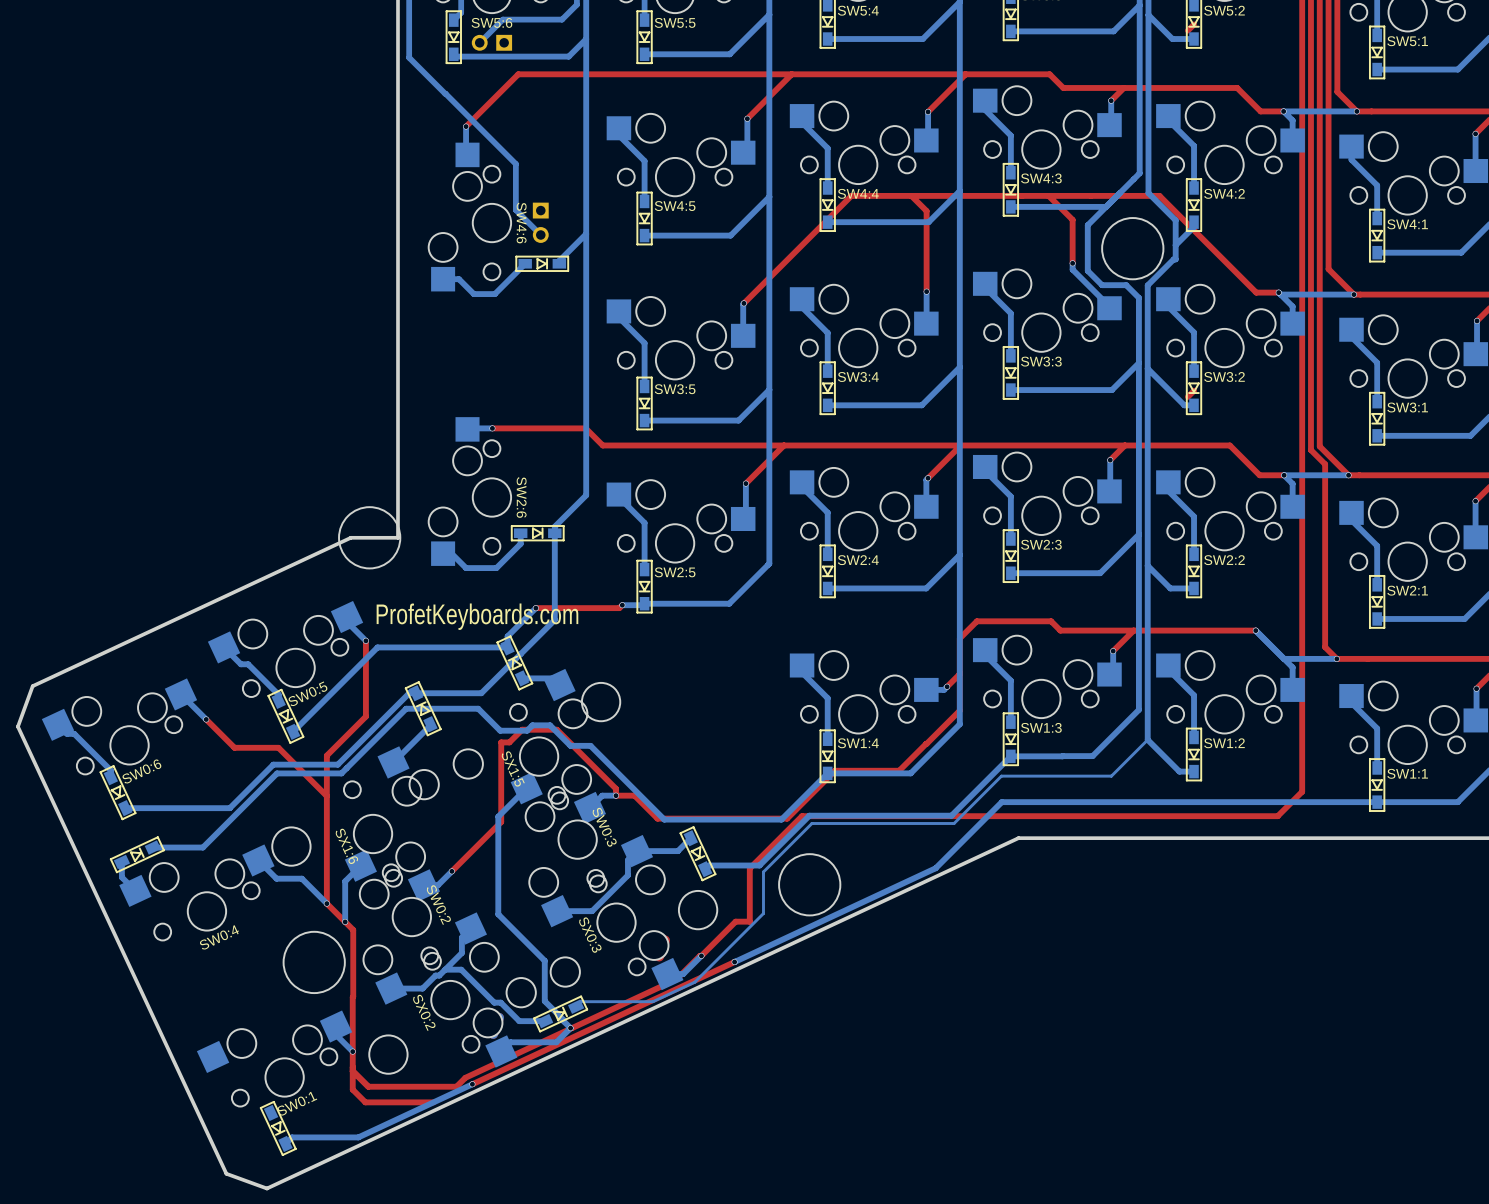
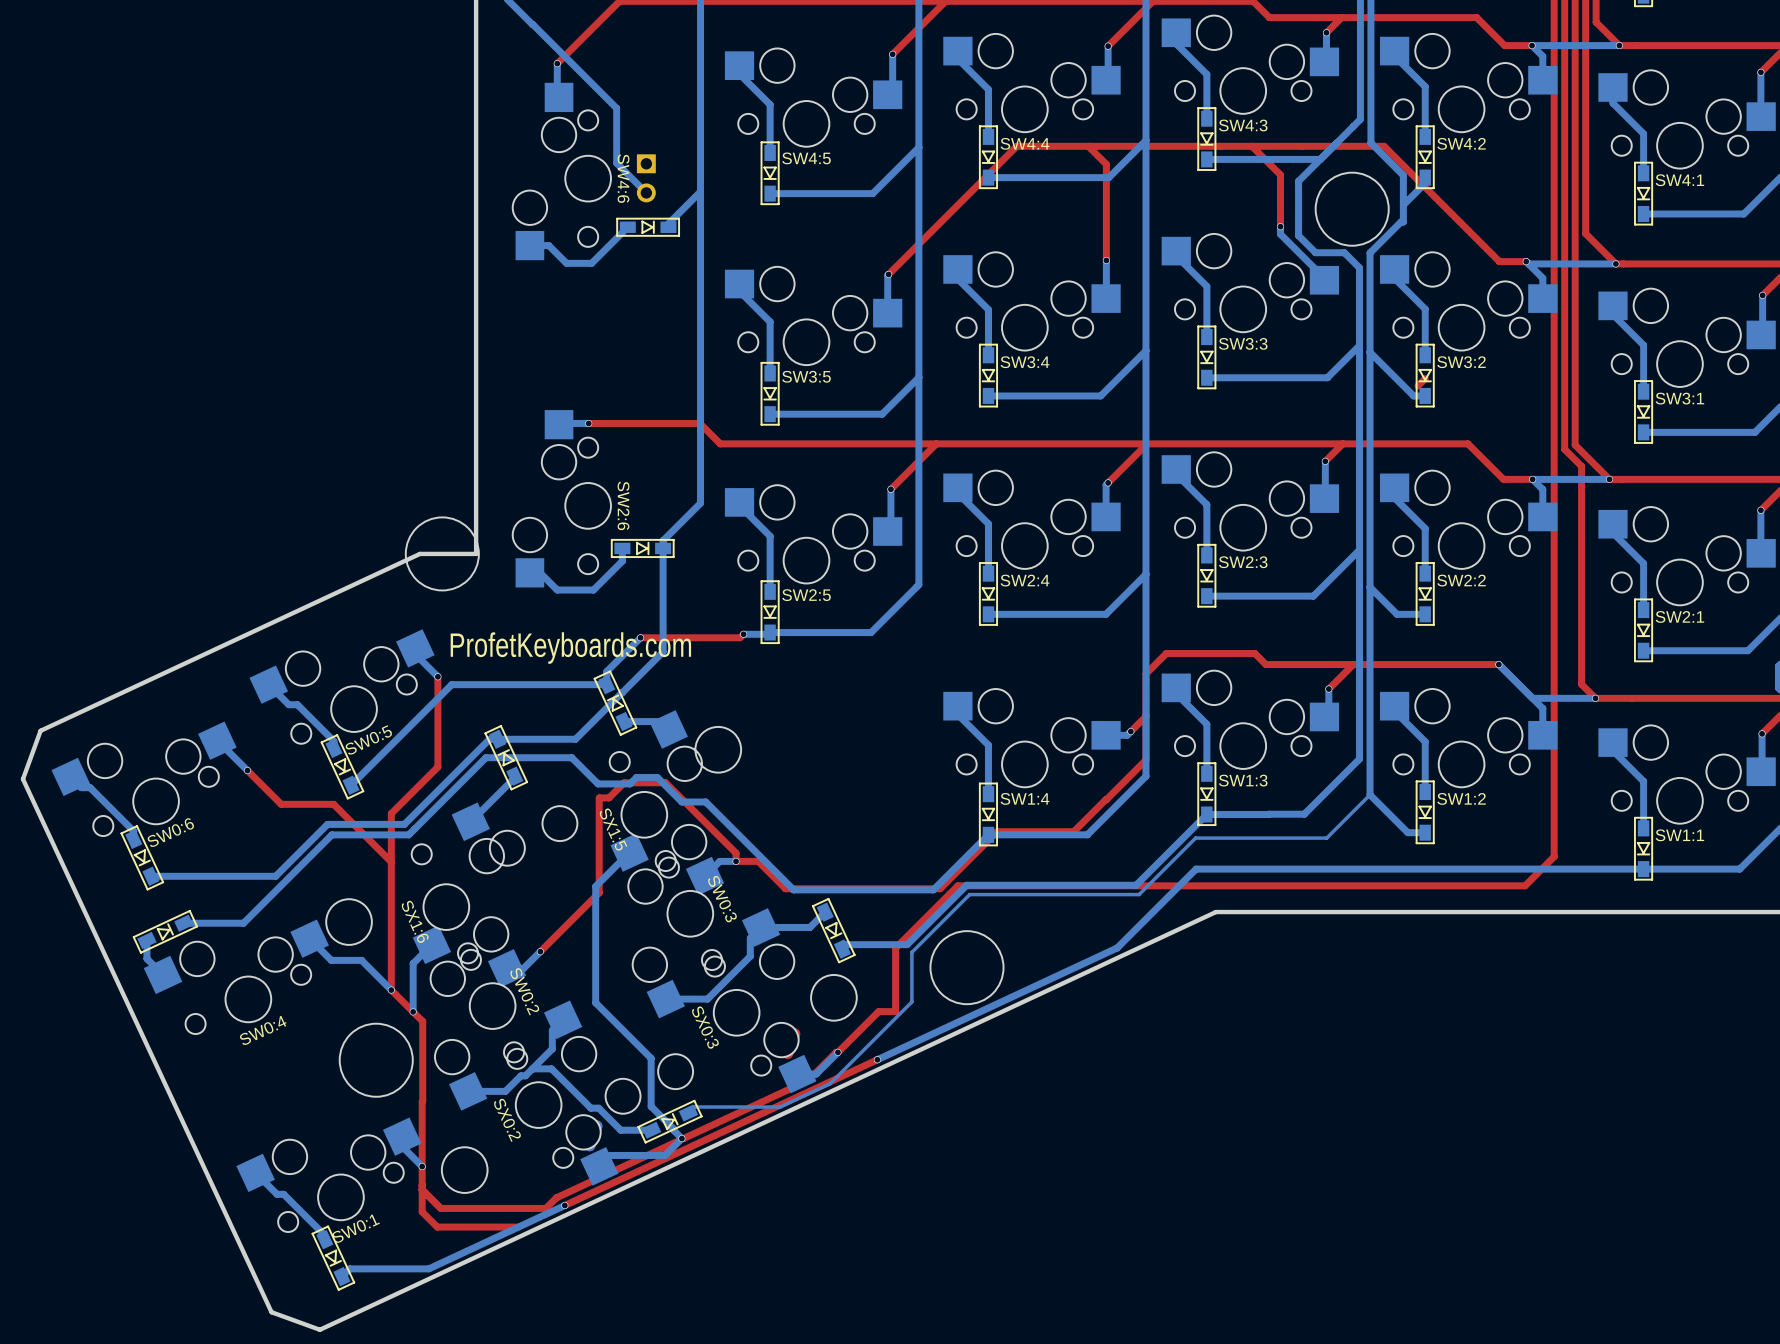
bottom track: none -> (255, 1172) (277, 1194) (283, 1194) (324, 1235) (324, 1239)

